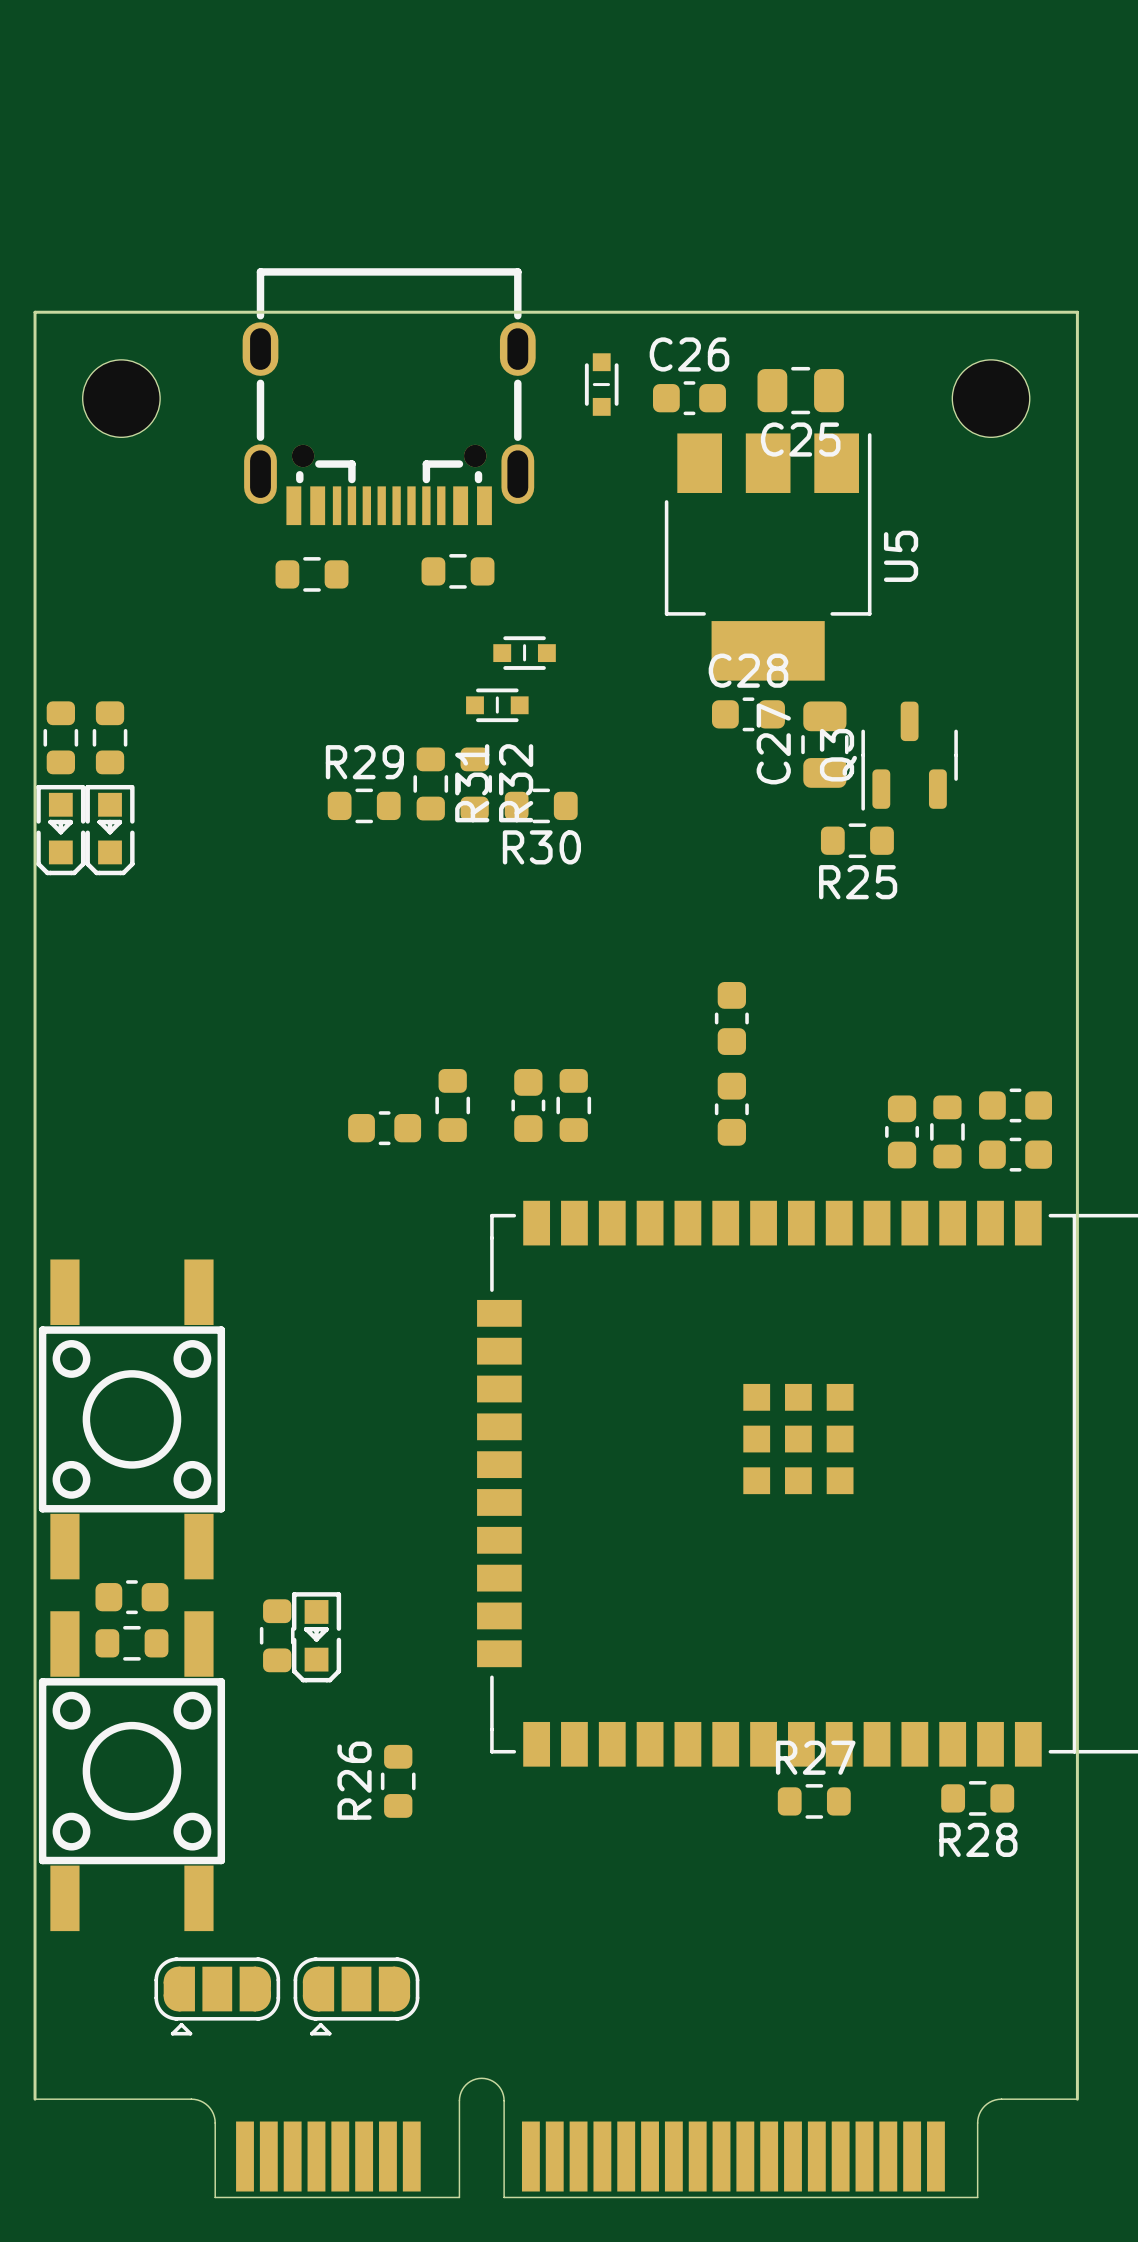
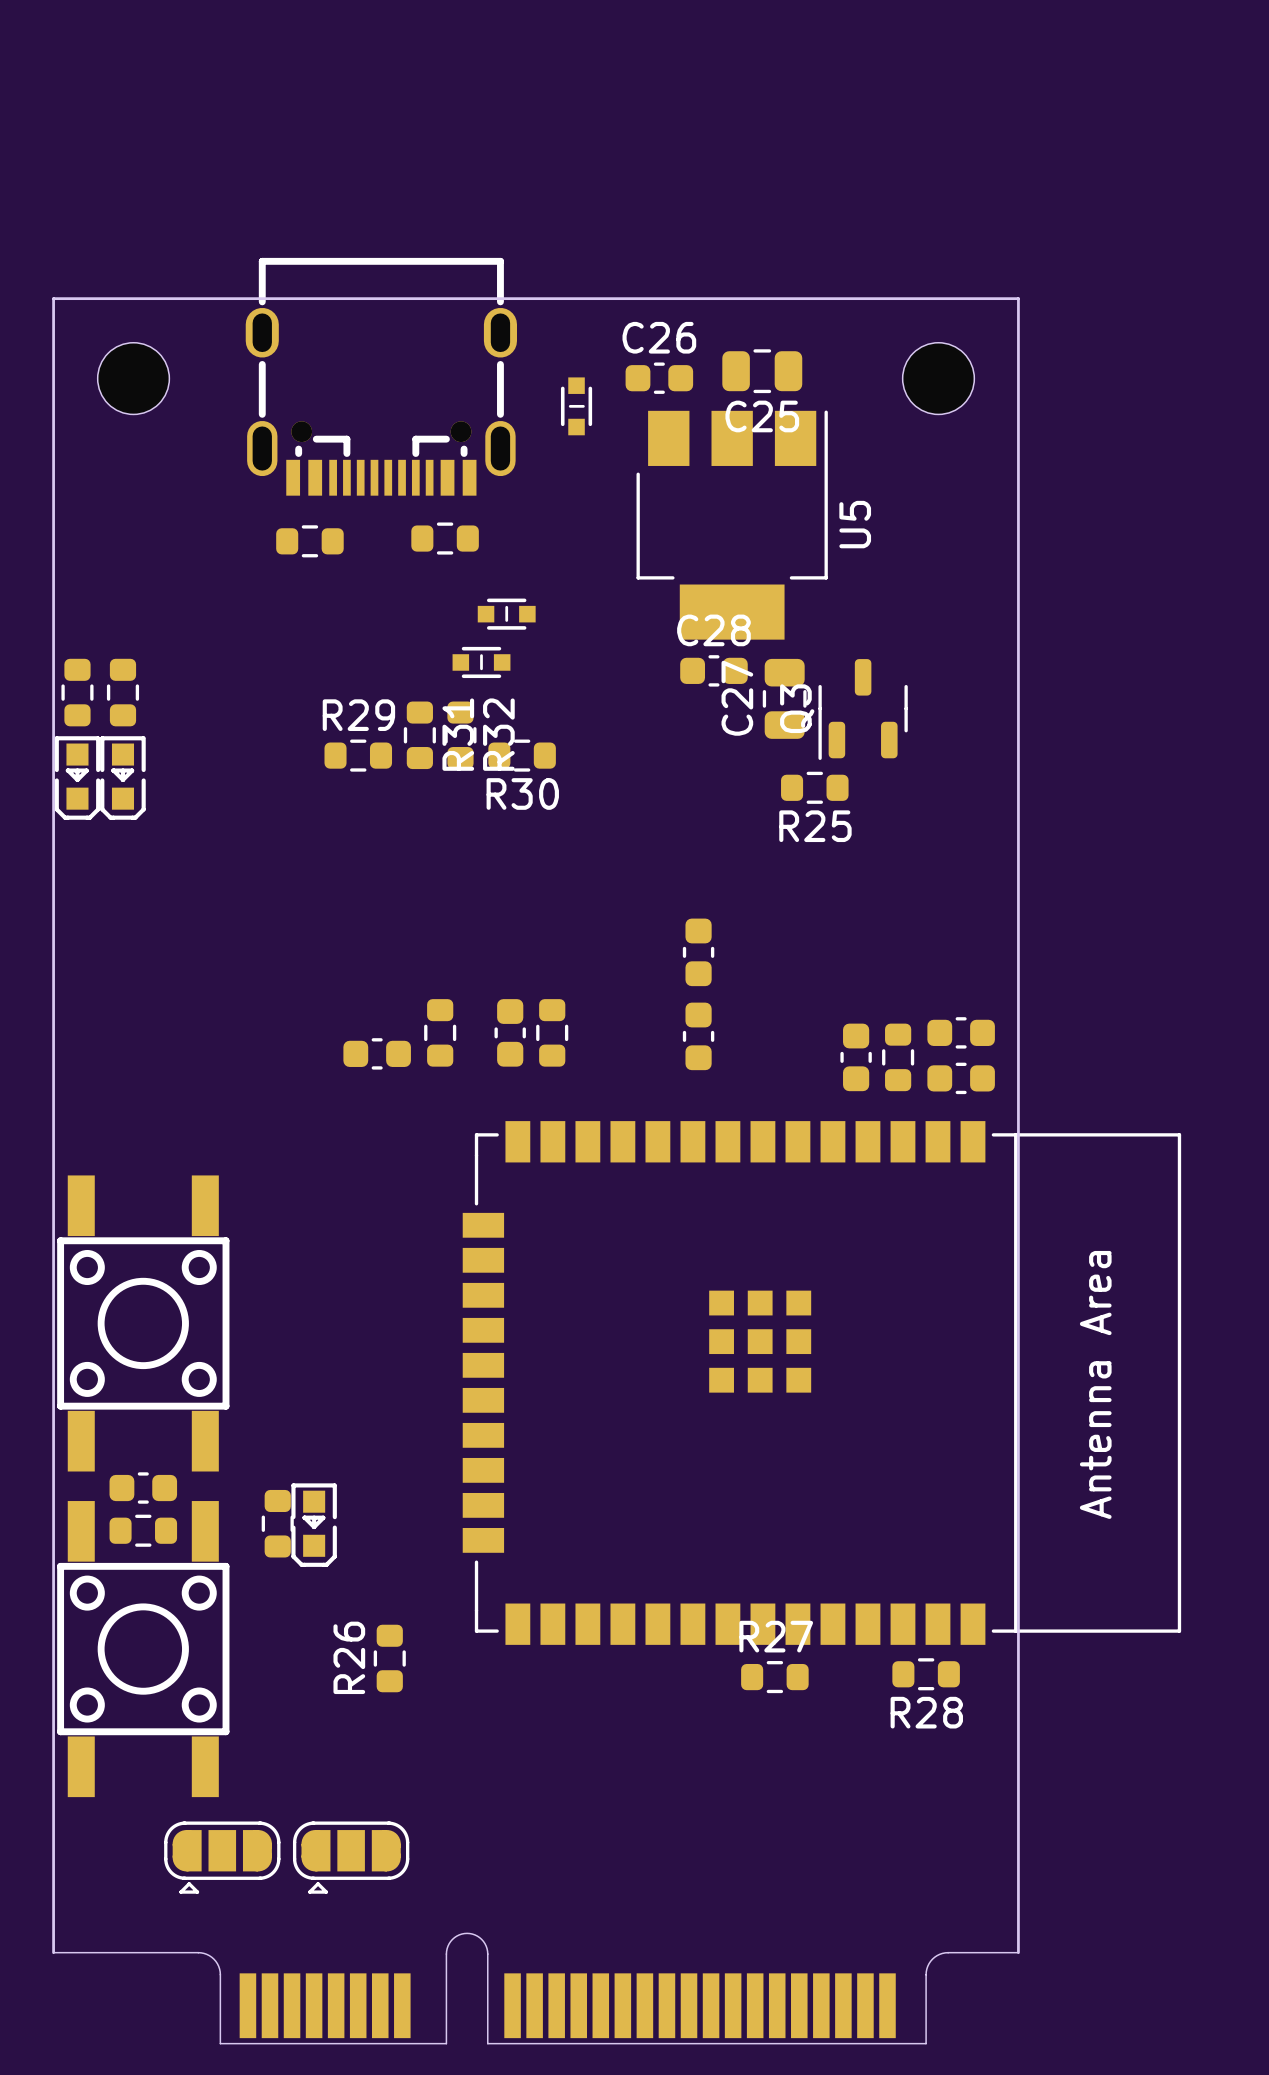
part position: (601, 384) -> (576, 406)

